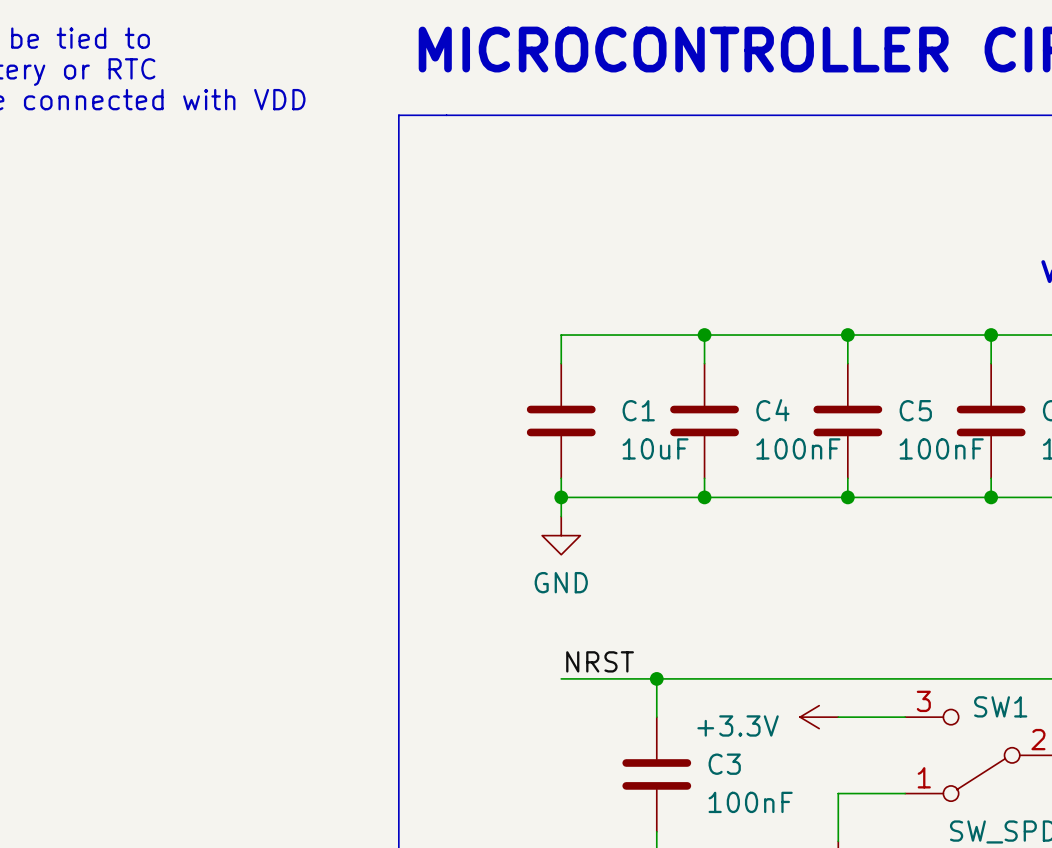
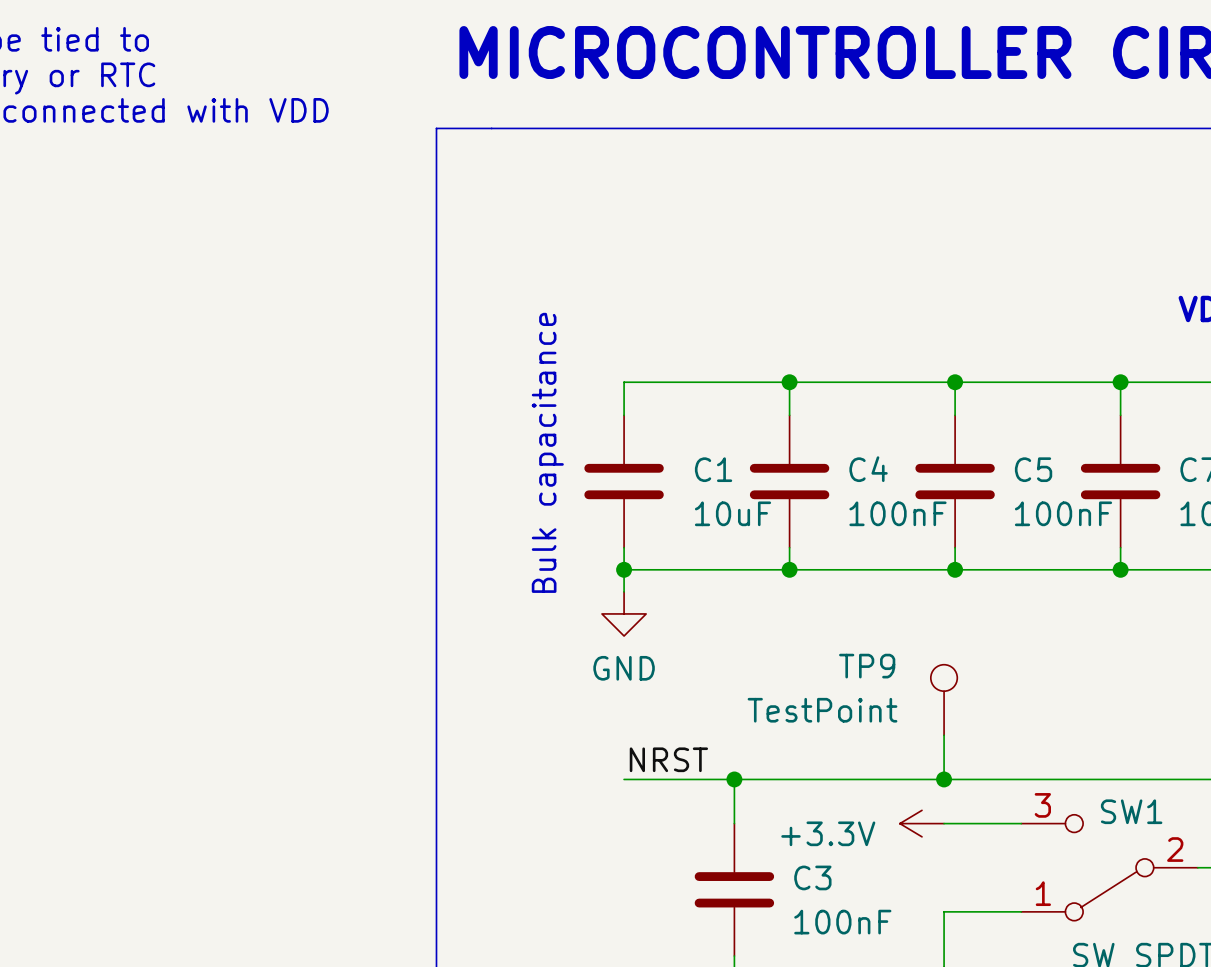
text: none -> Bulk capacitance (547, 452)
TP9: none -> TestPoint (944, 700)
wire: none -> (944, 735) (944, 779)
junction: none -> (944, 779)

